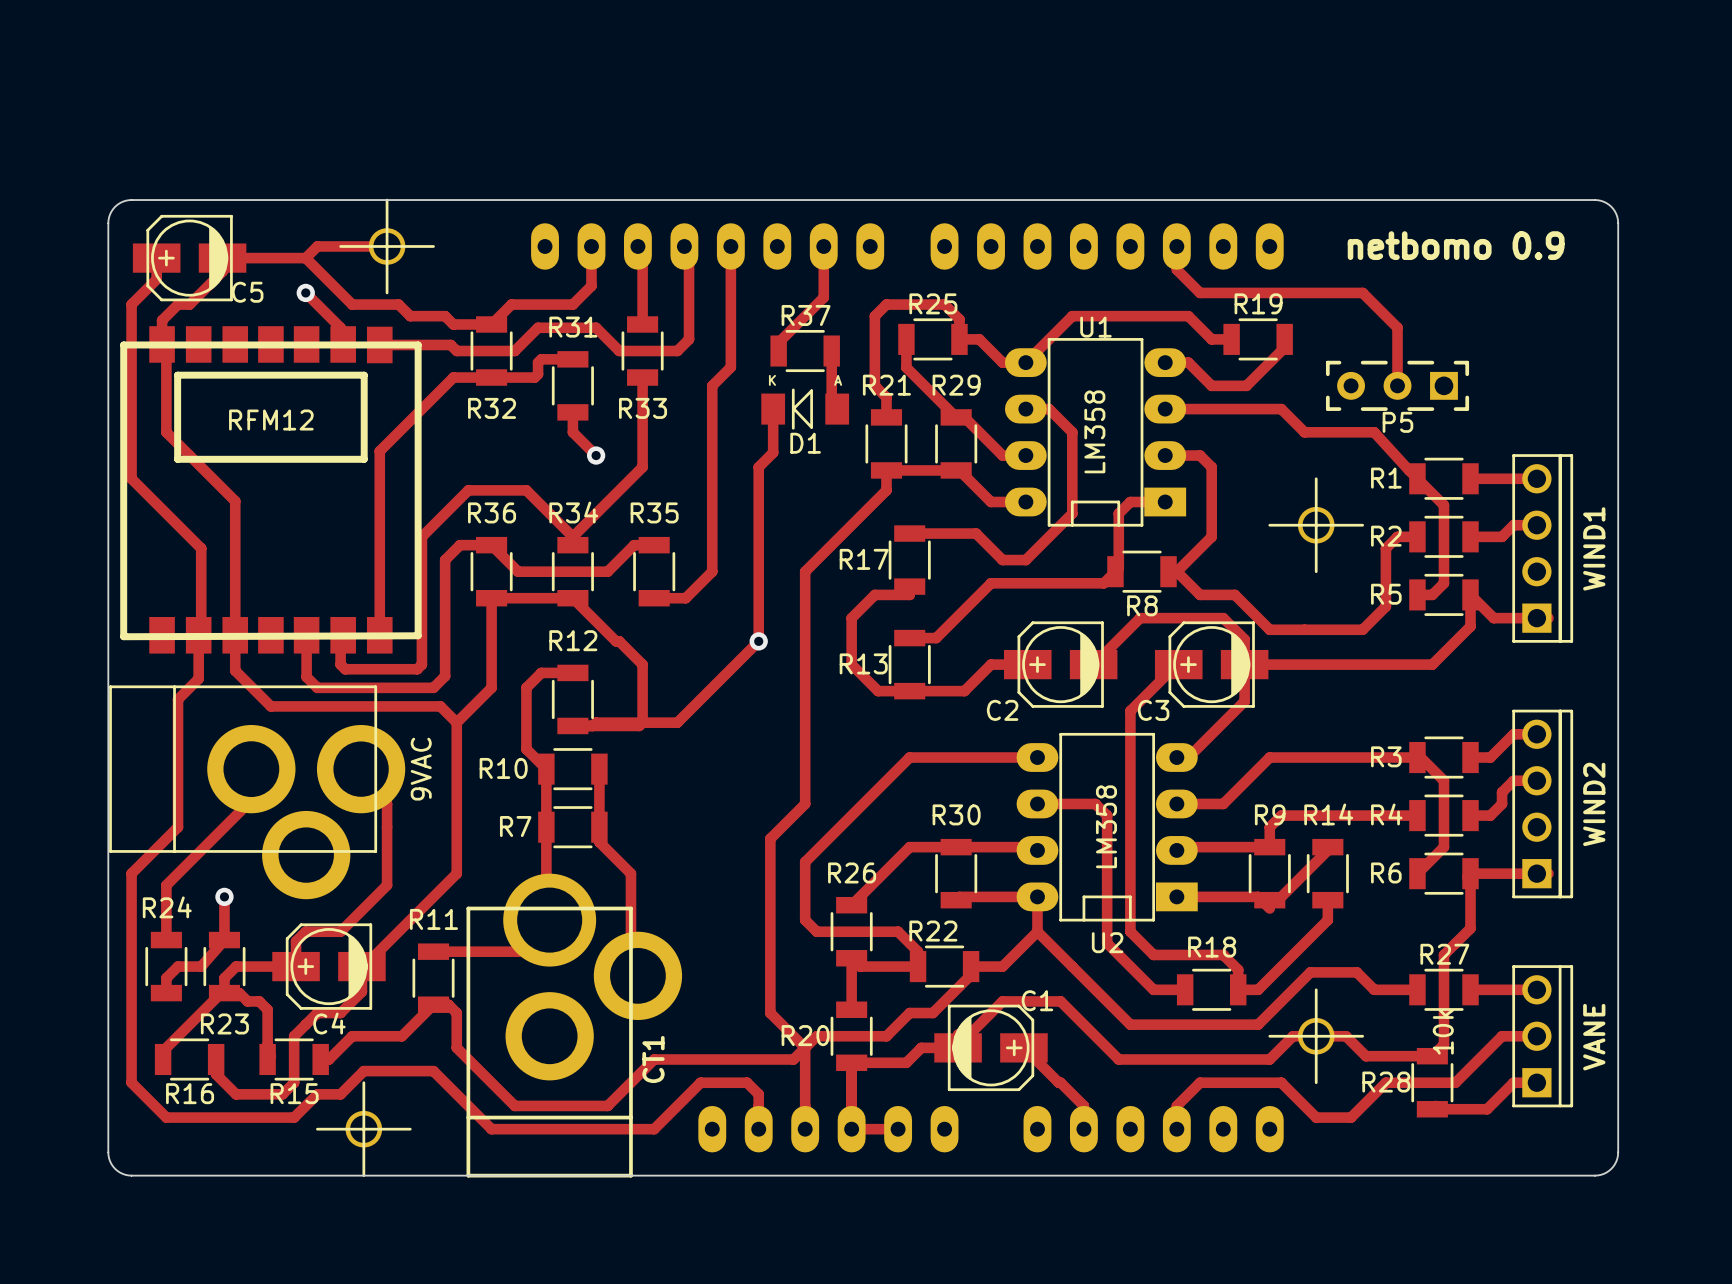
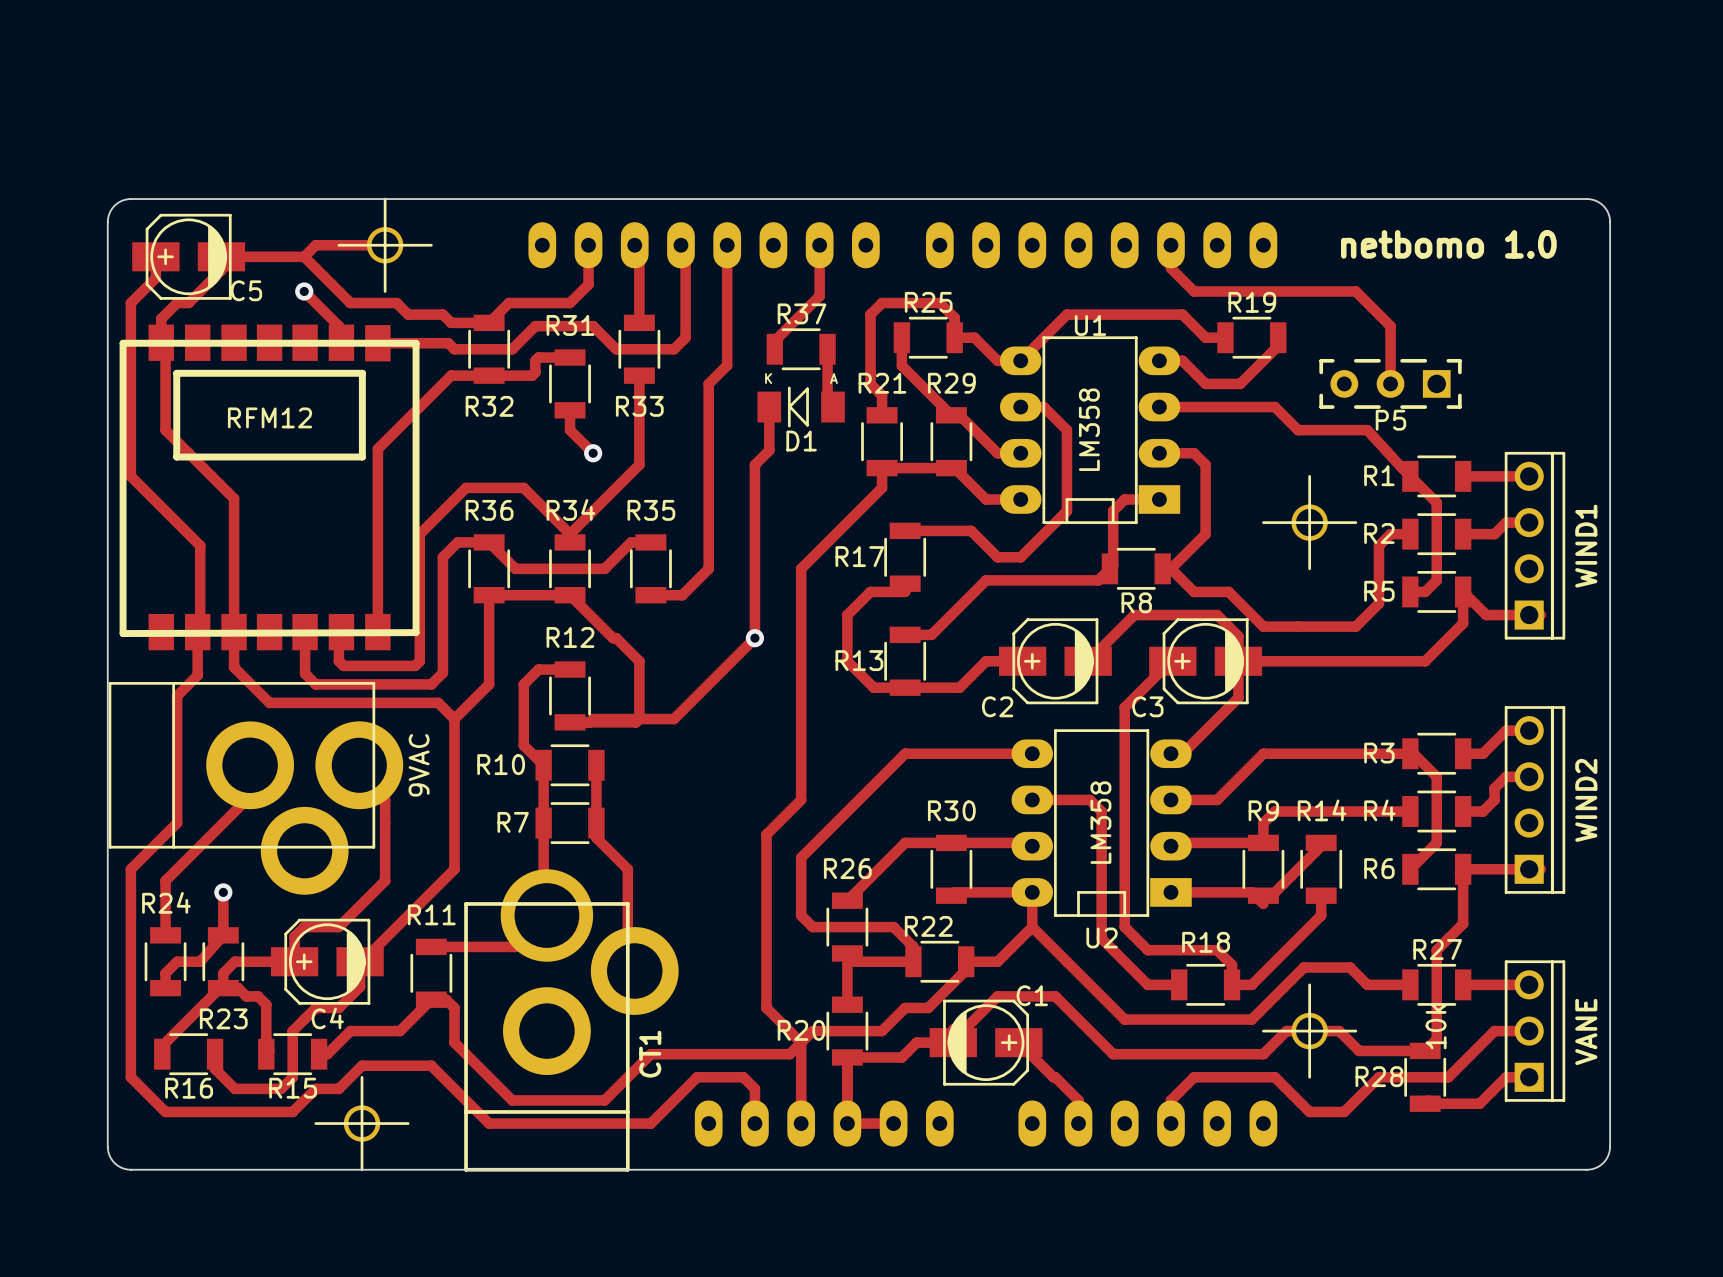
netbomo 0.9 name: netbomo 0.9 (1456, 245) -> netbomo 1.0 (1448, 244)

